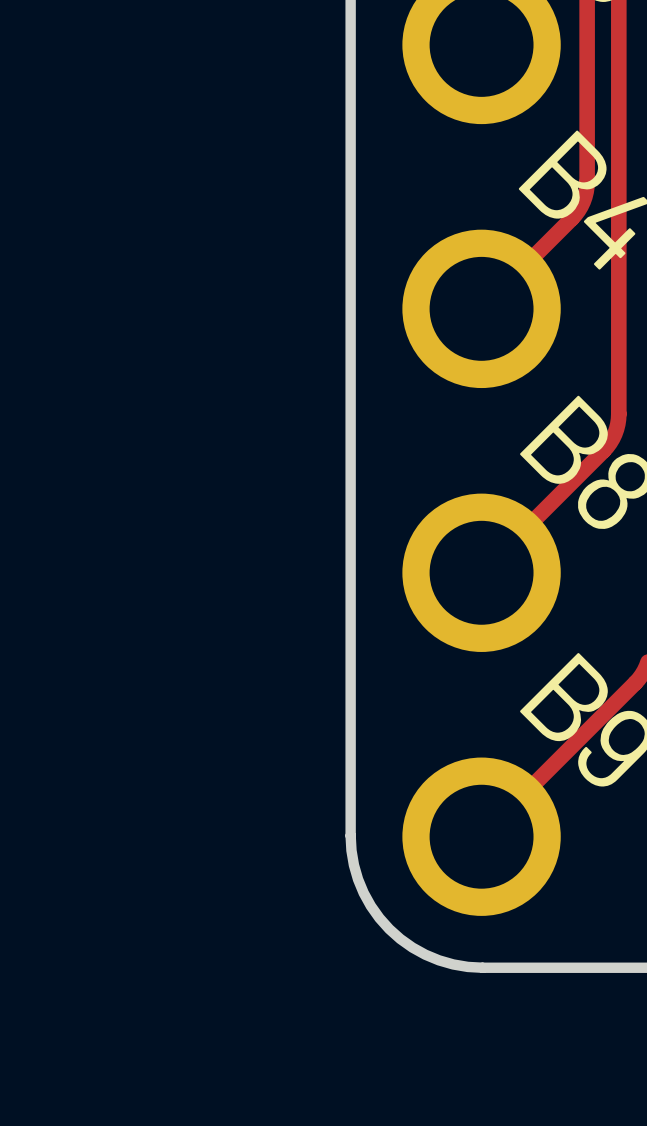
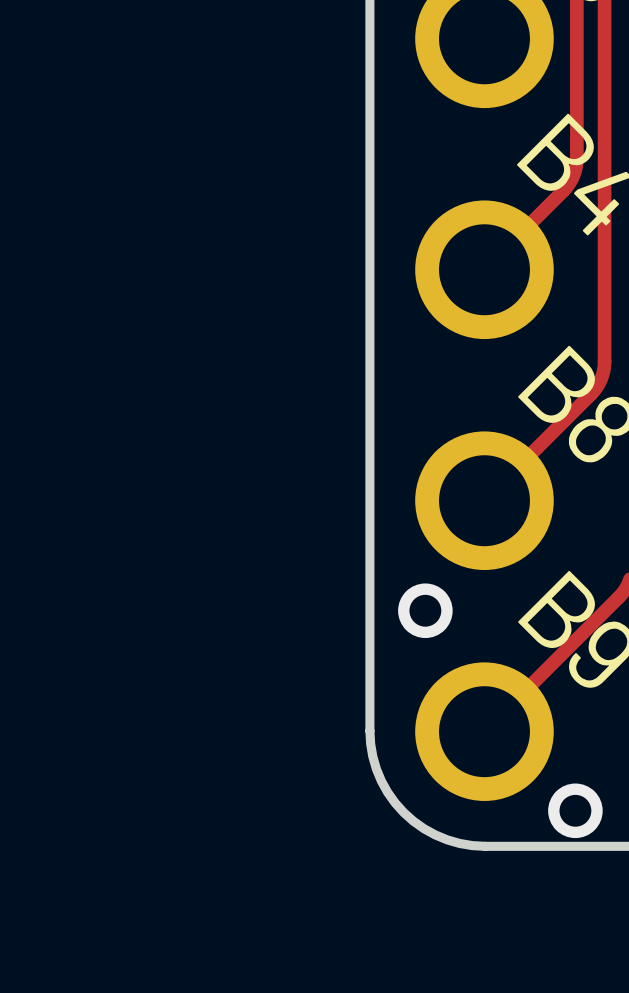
via: none -> (425, 610)
via: none -> (575, 810)

